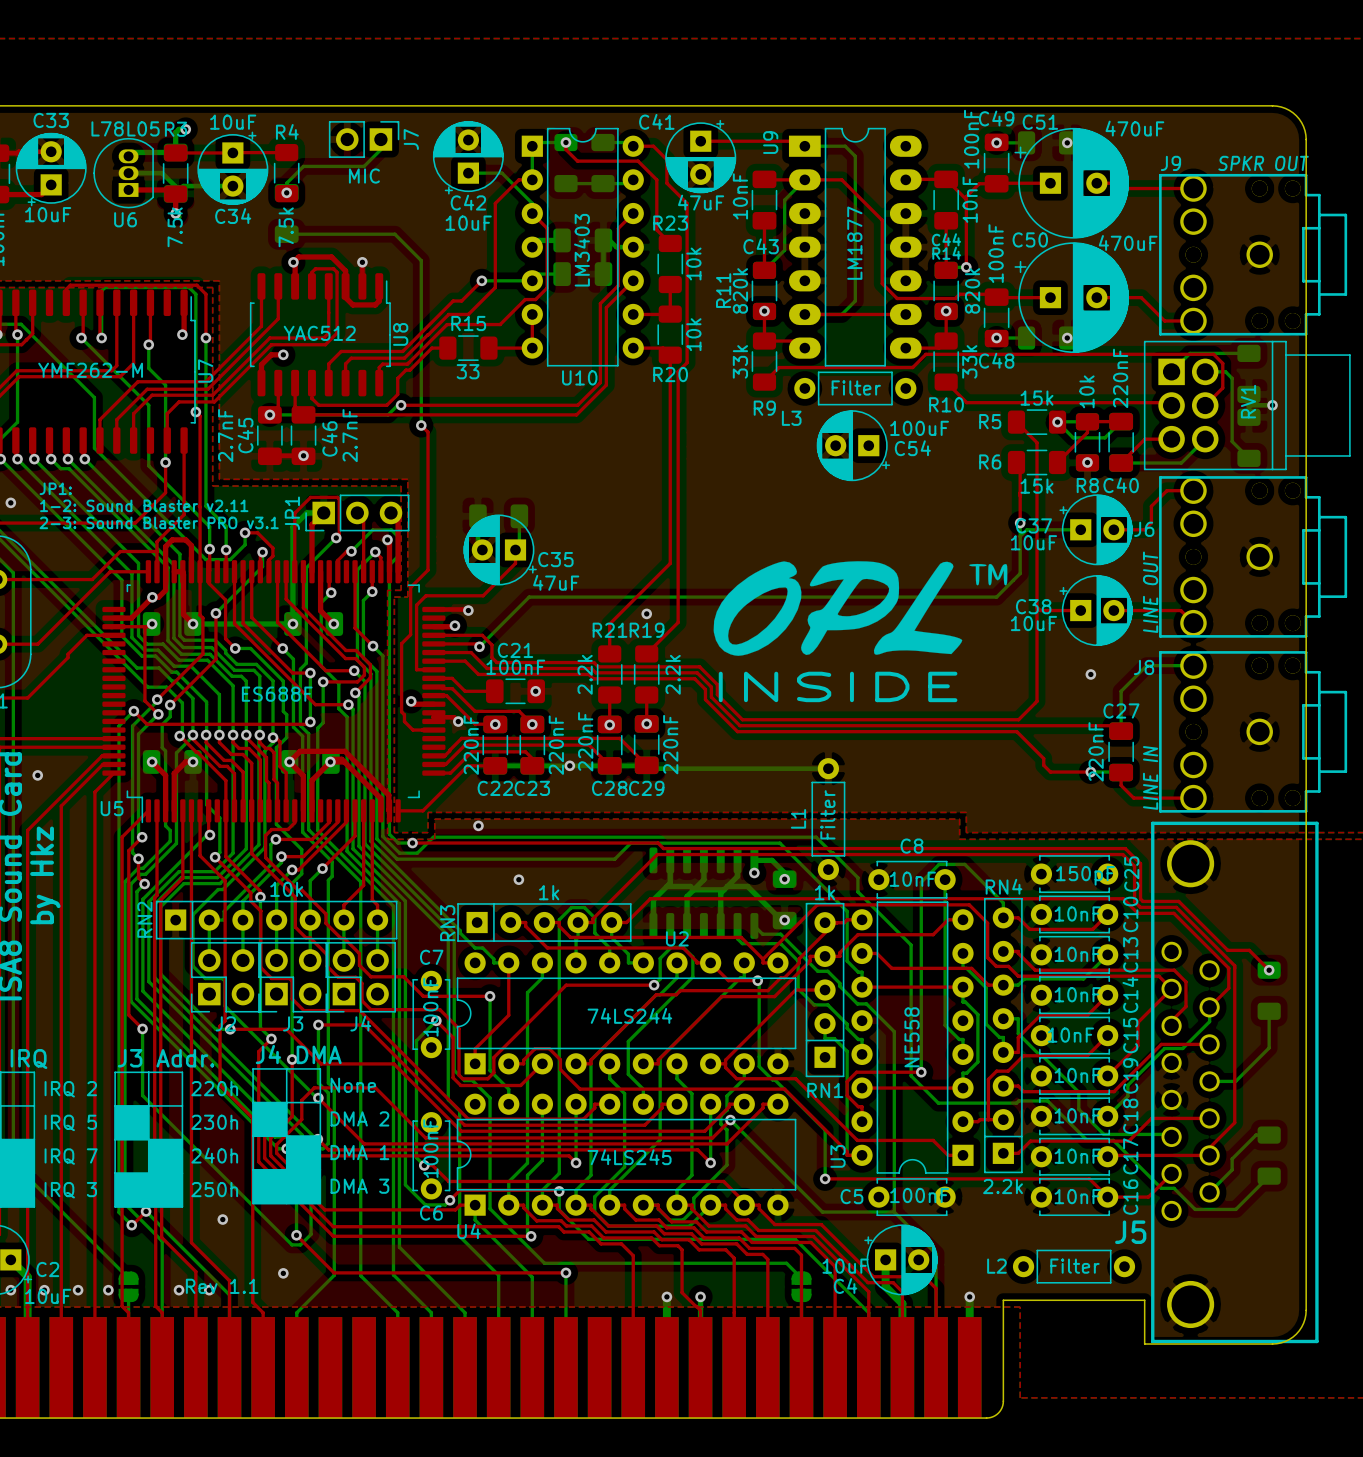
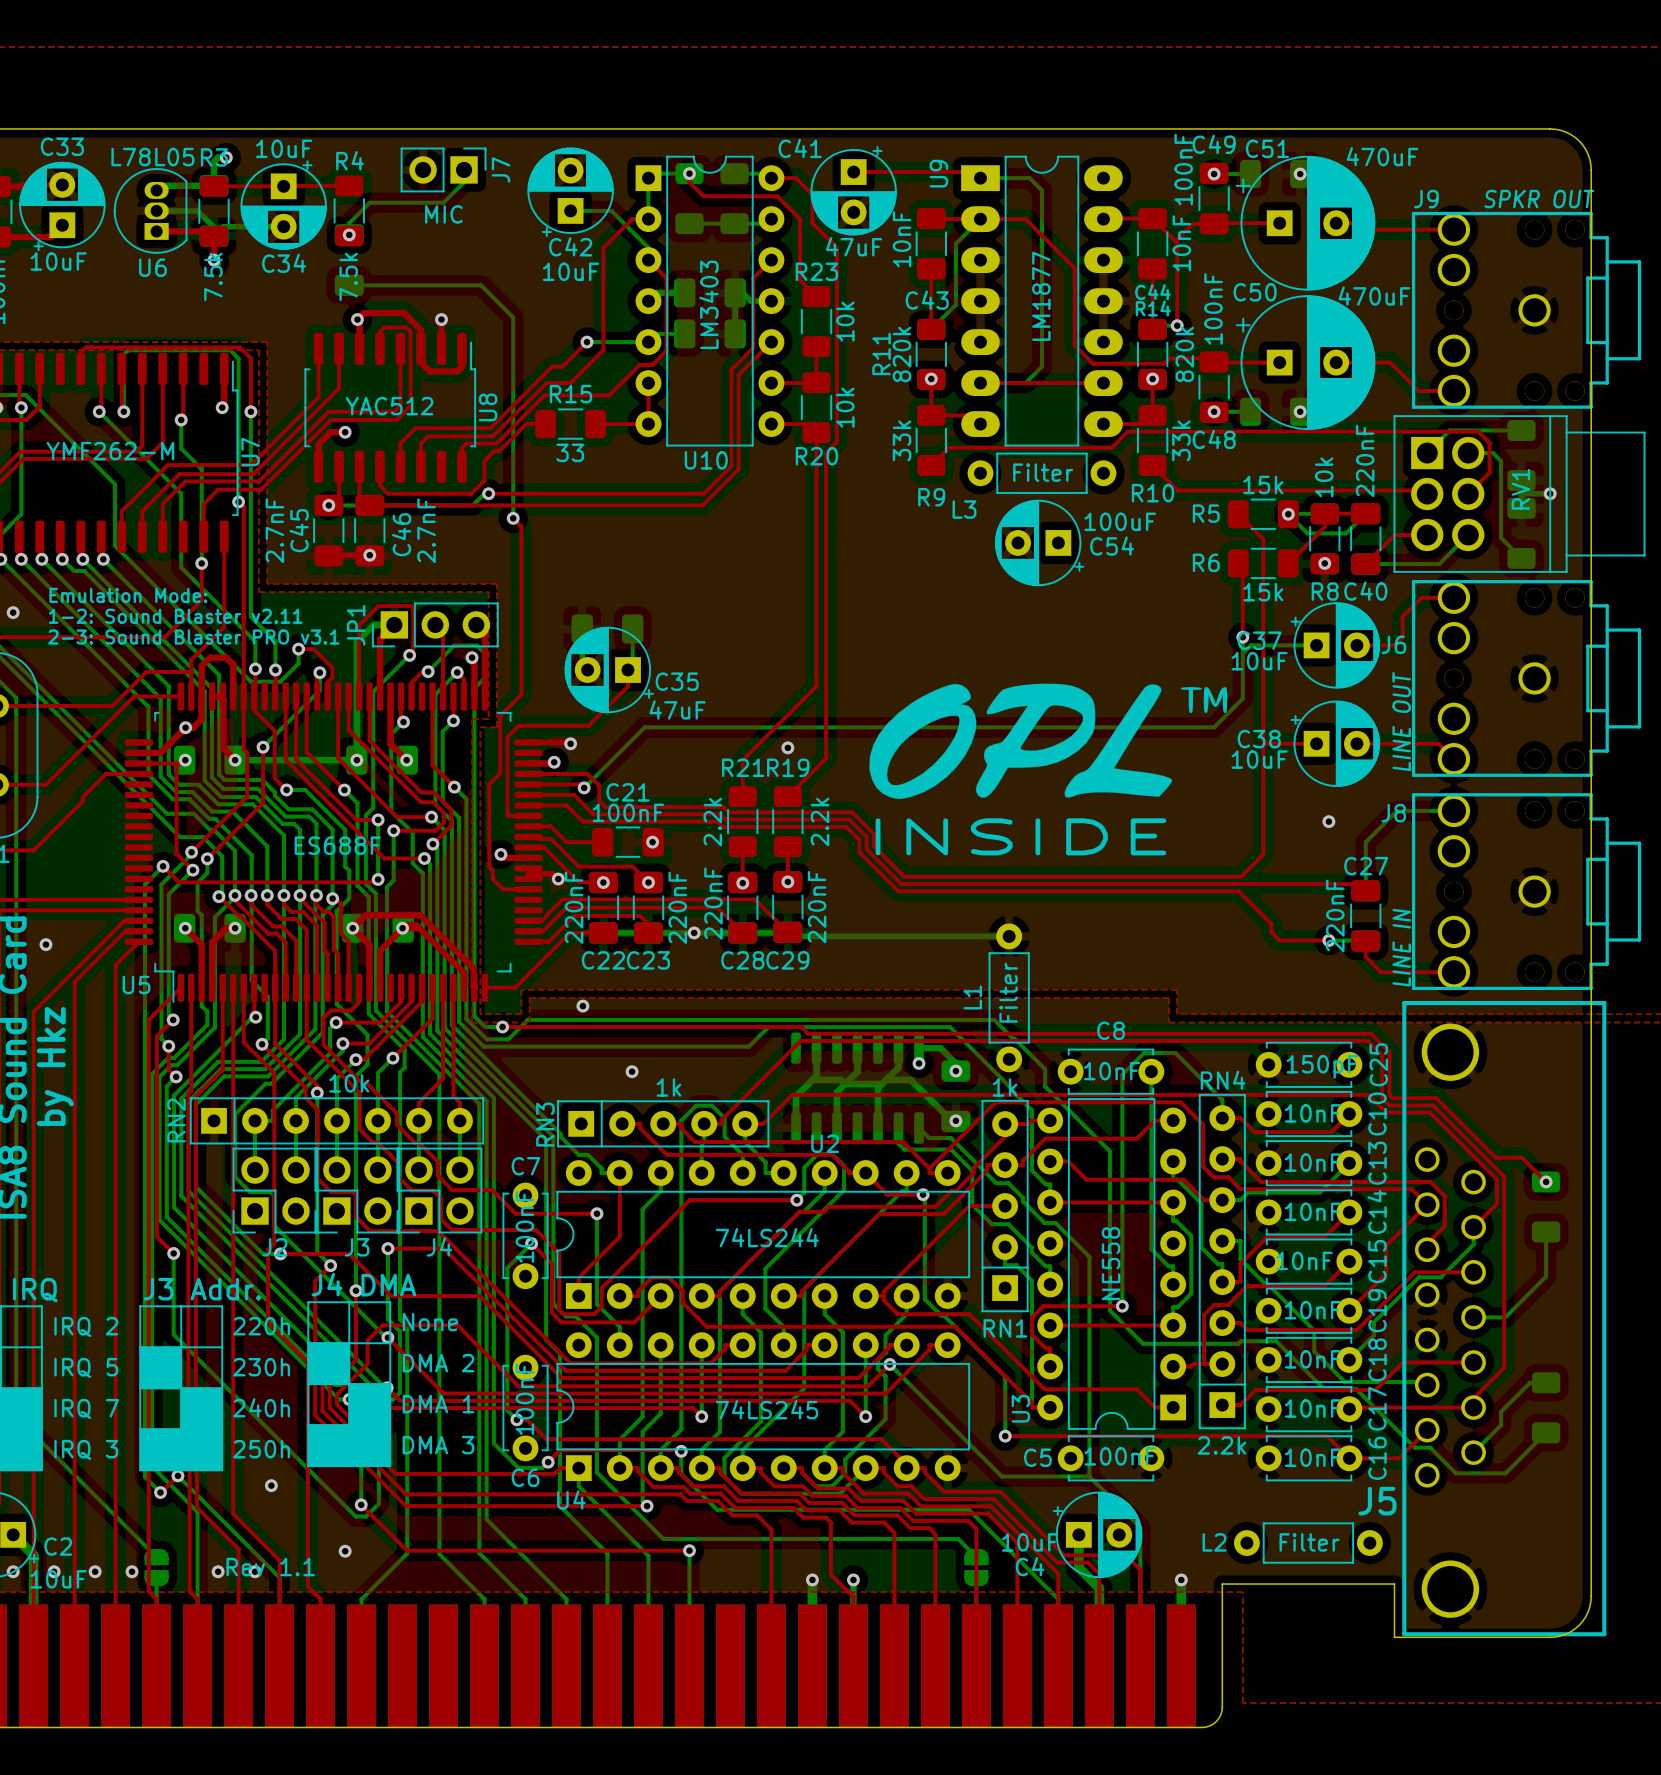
text: JP1: (55, 488) -> Emulation Mode: (128, 595)

